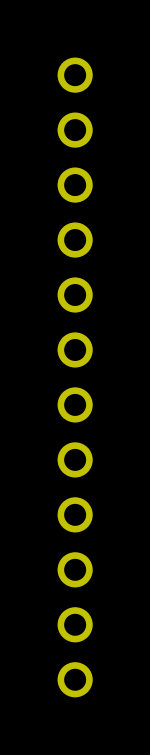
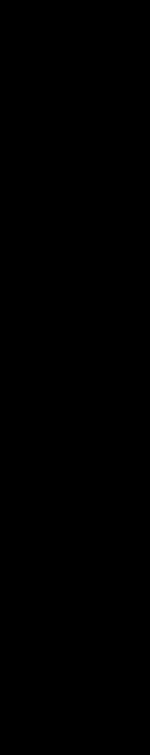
part: (75, 377) -> none

